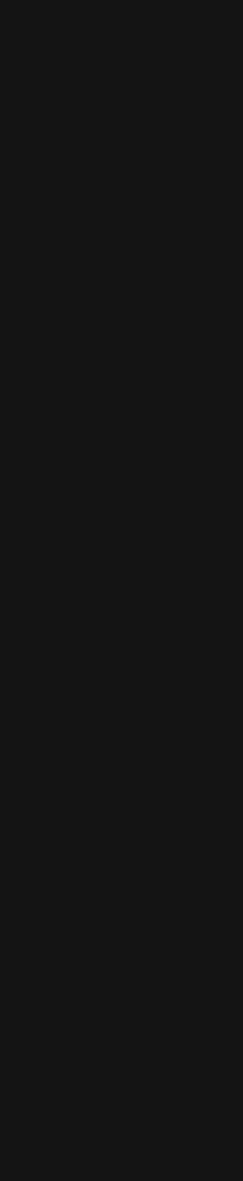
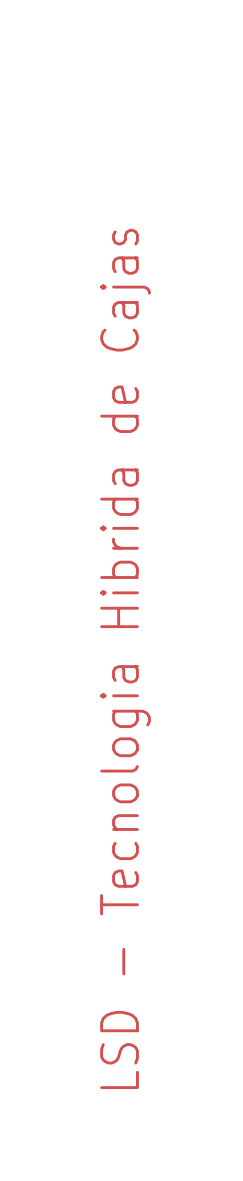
text: none -> LSD - Tecnologia Hibrida de Cajas (125, 658)

